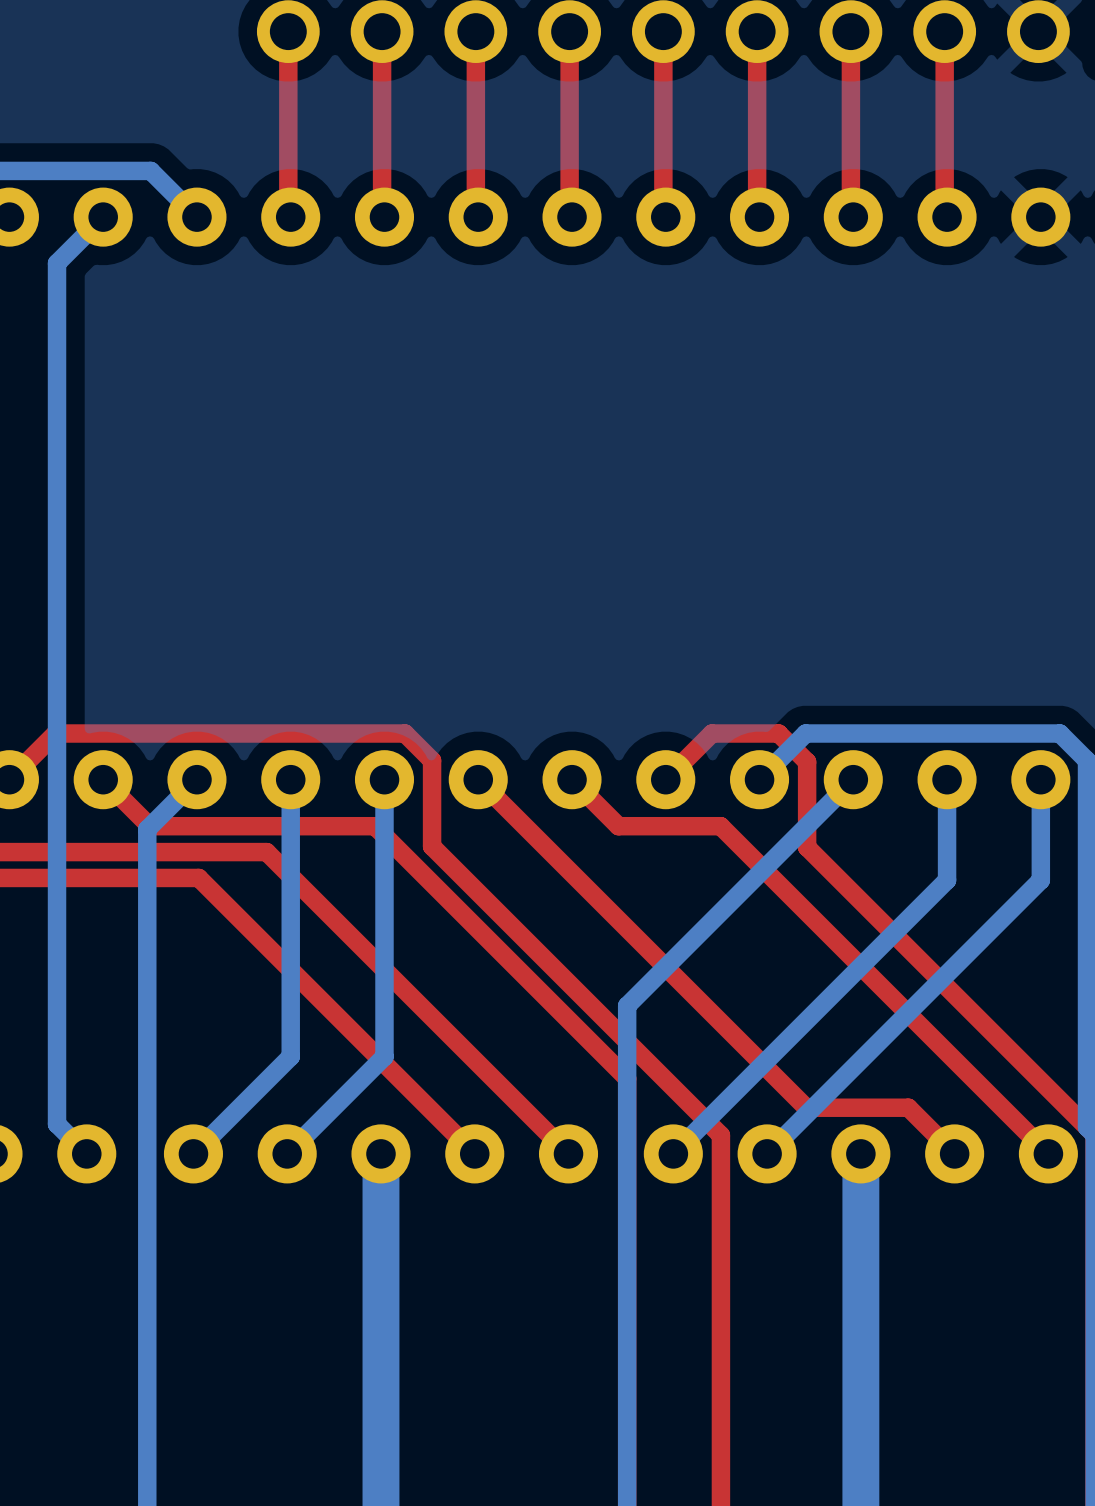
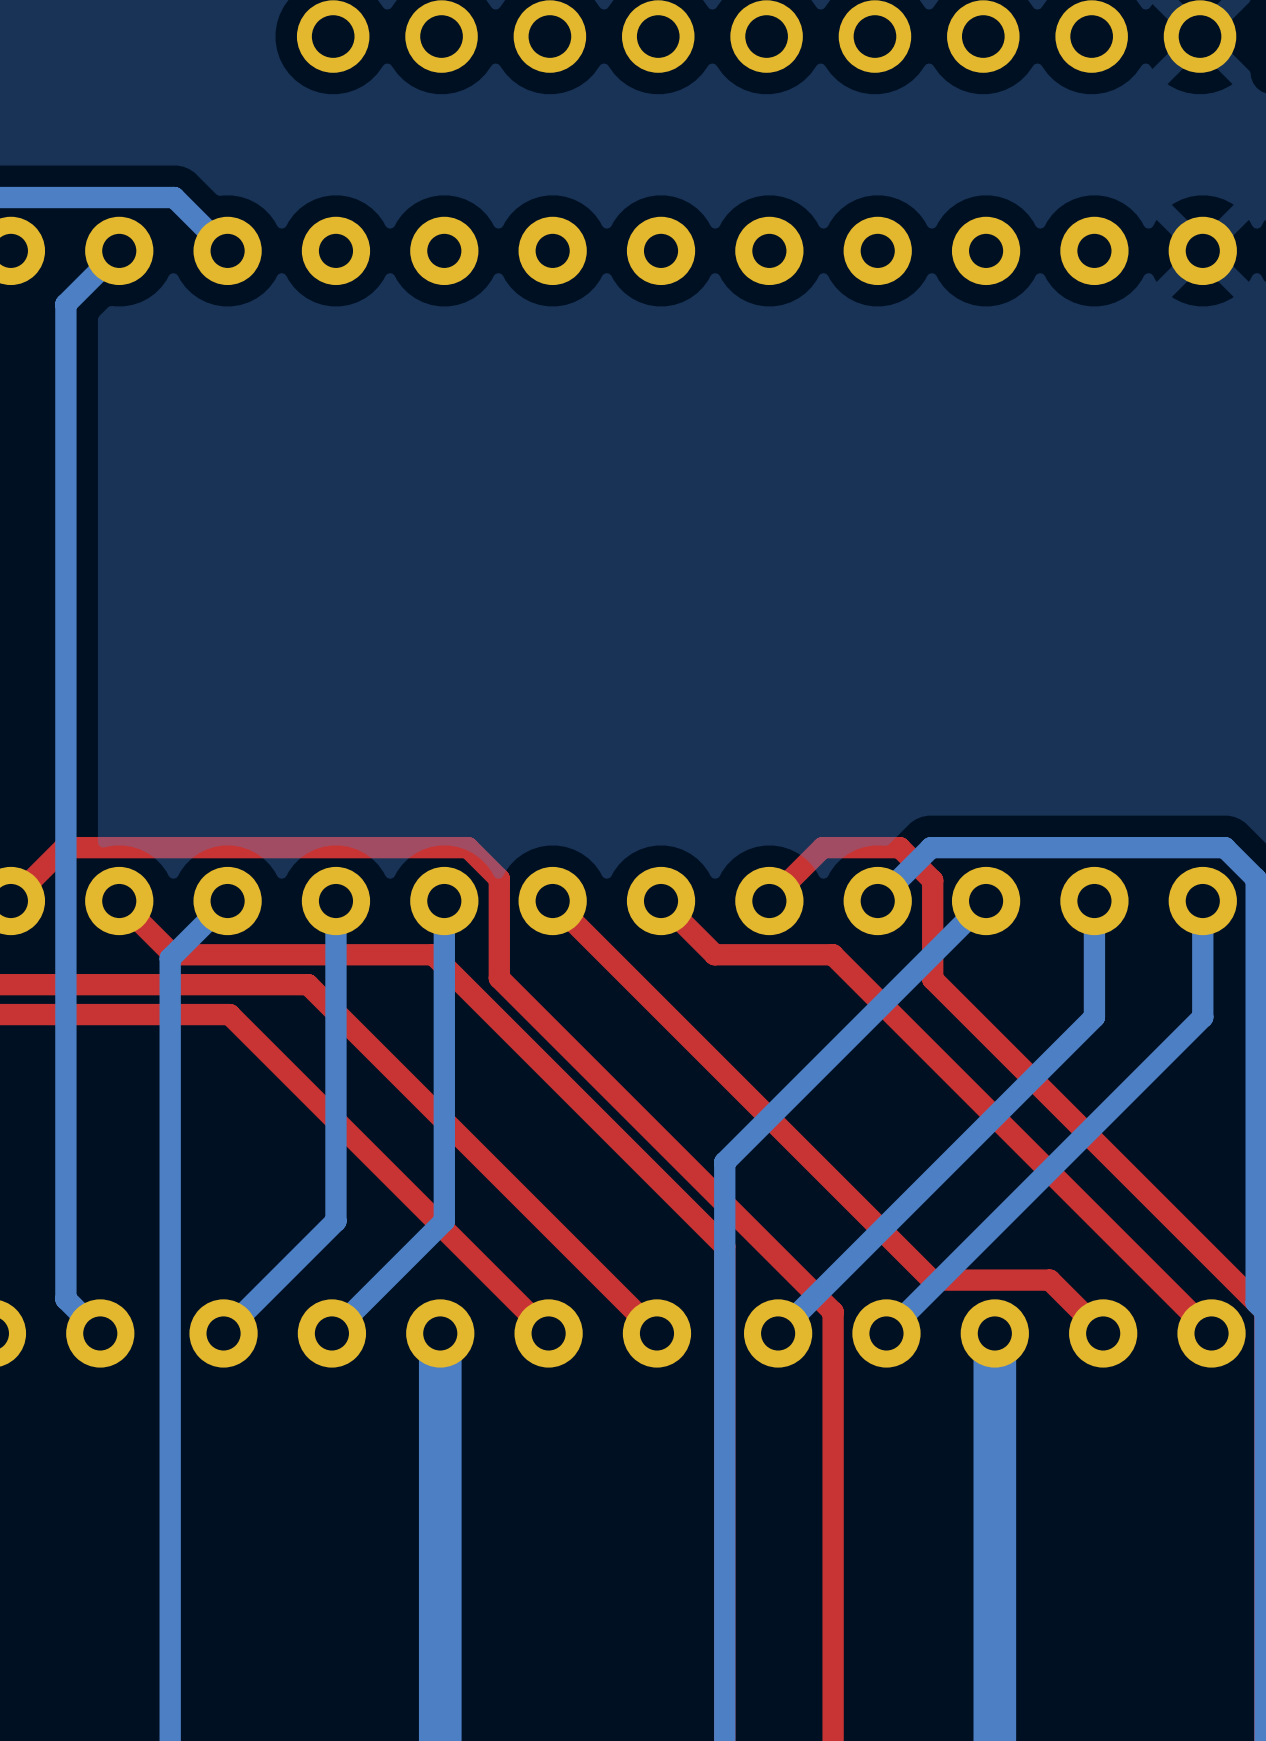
top track: (288, 31) (288, 214) -> none
top track: (382, 31) (382, 214) -> none
top track: (475, 31) (475, 214) -> none
top track: (569, 31) (569, 214) -> none
top track: (663, 31) (663, 214) -> none
top track: (757, 31) (757, 214) -> none
top track: (850, 31) (850, 214) -> none
top track: (944, 31) (944, 214) -> none

